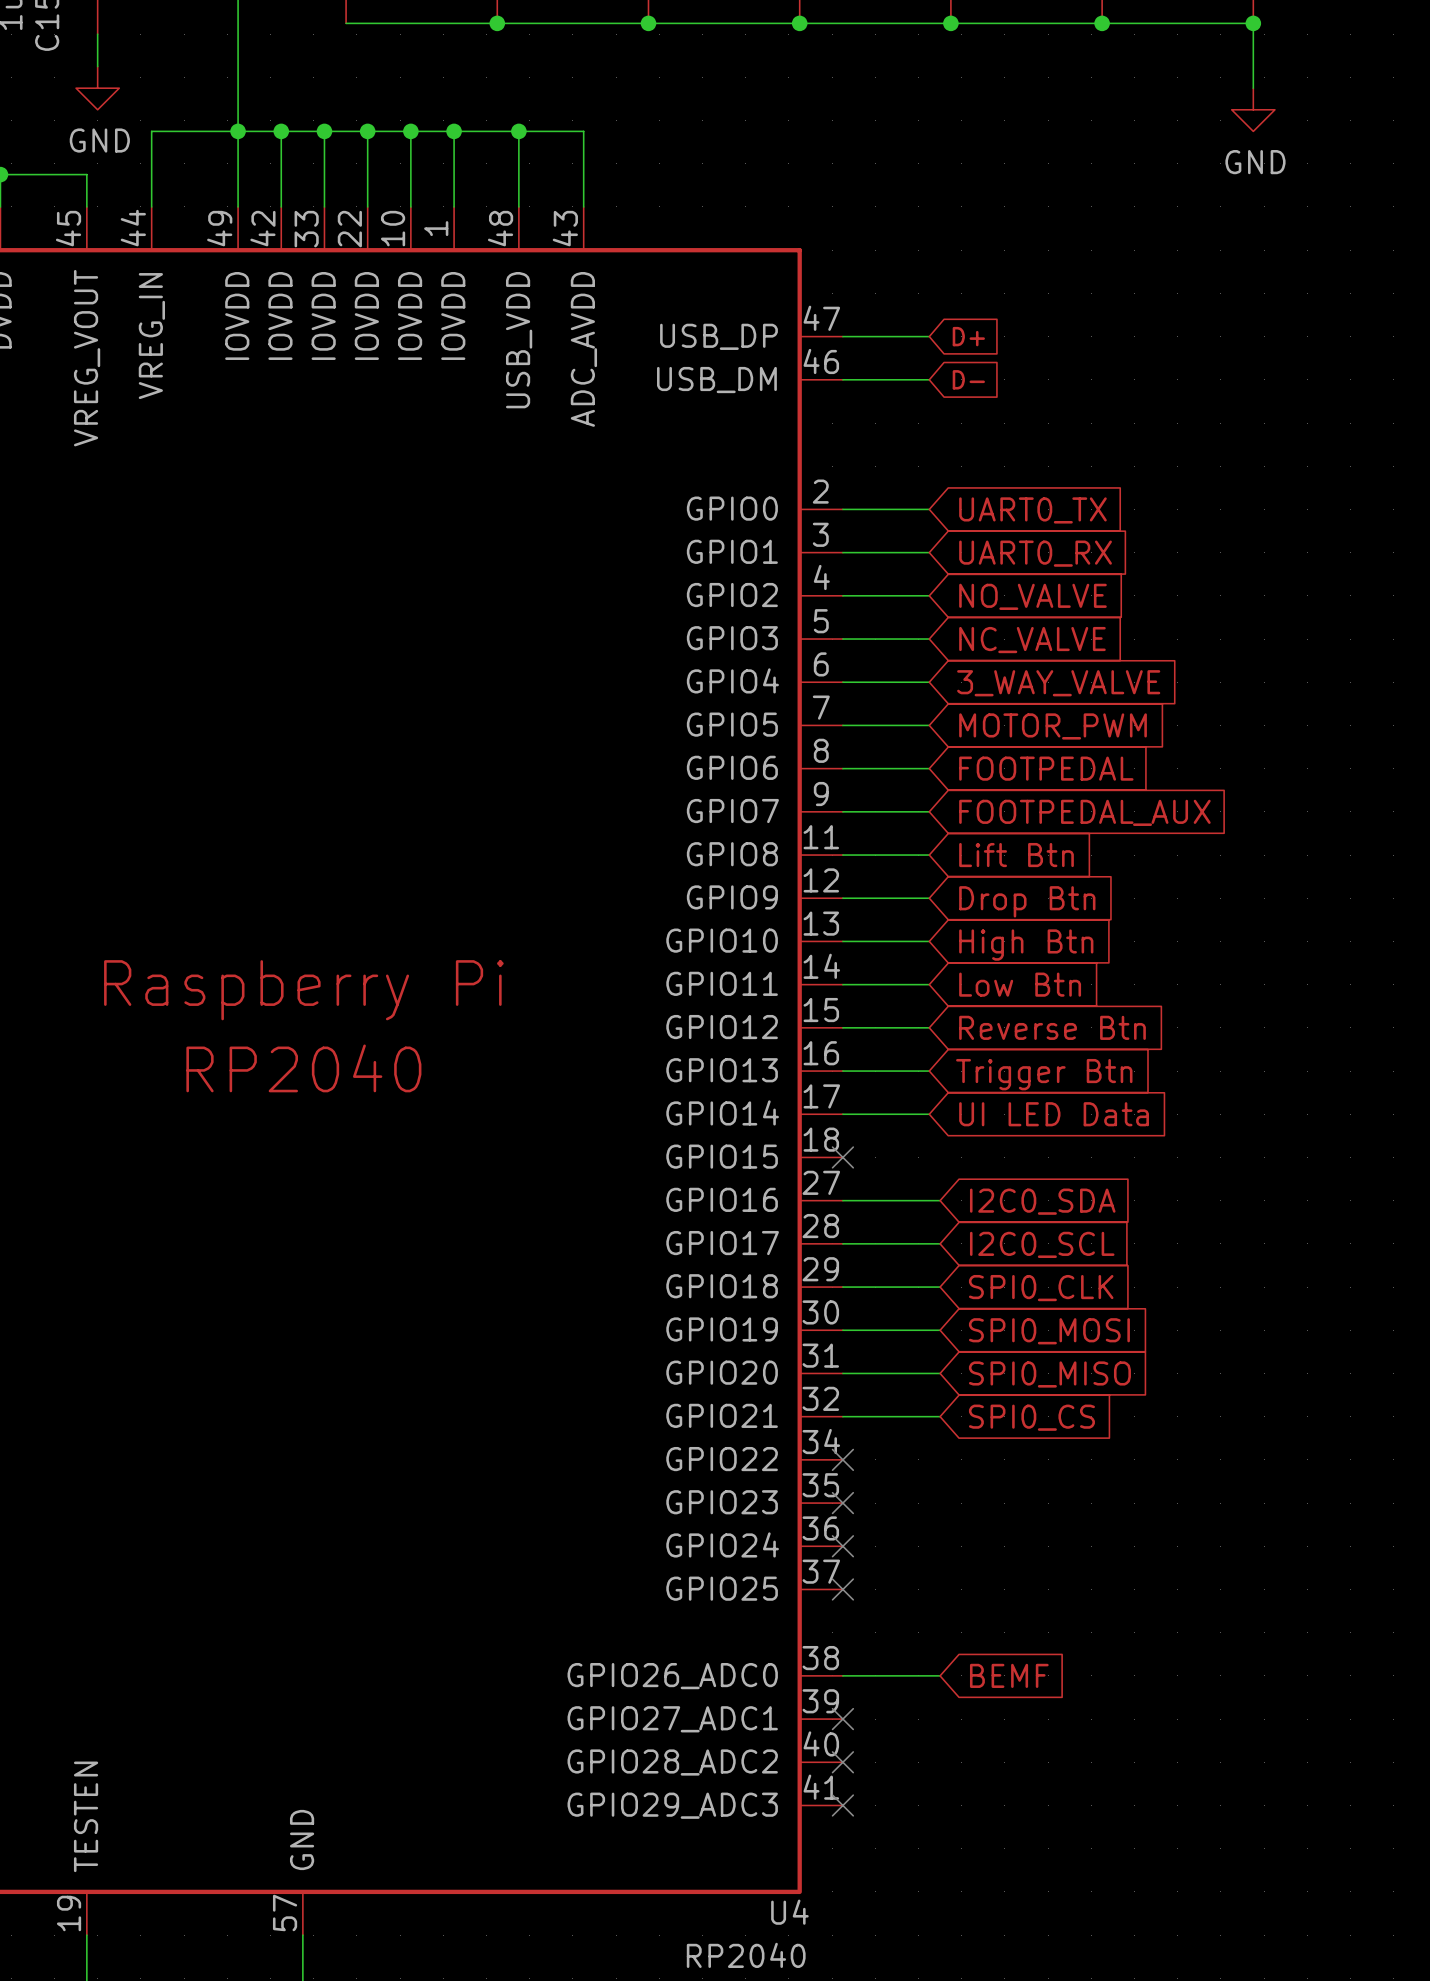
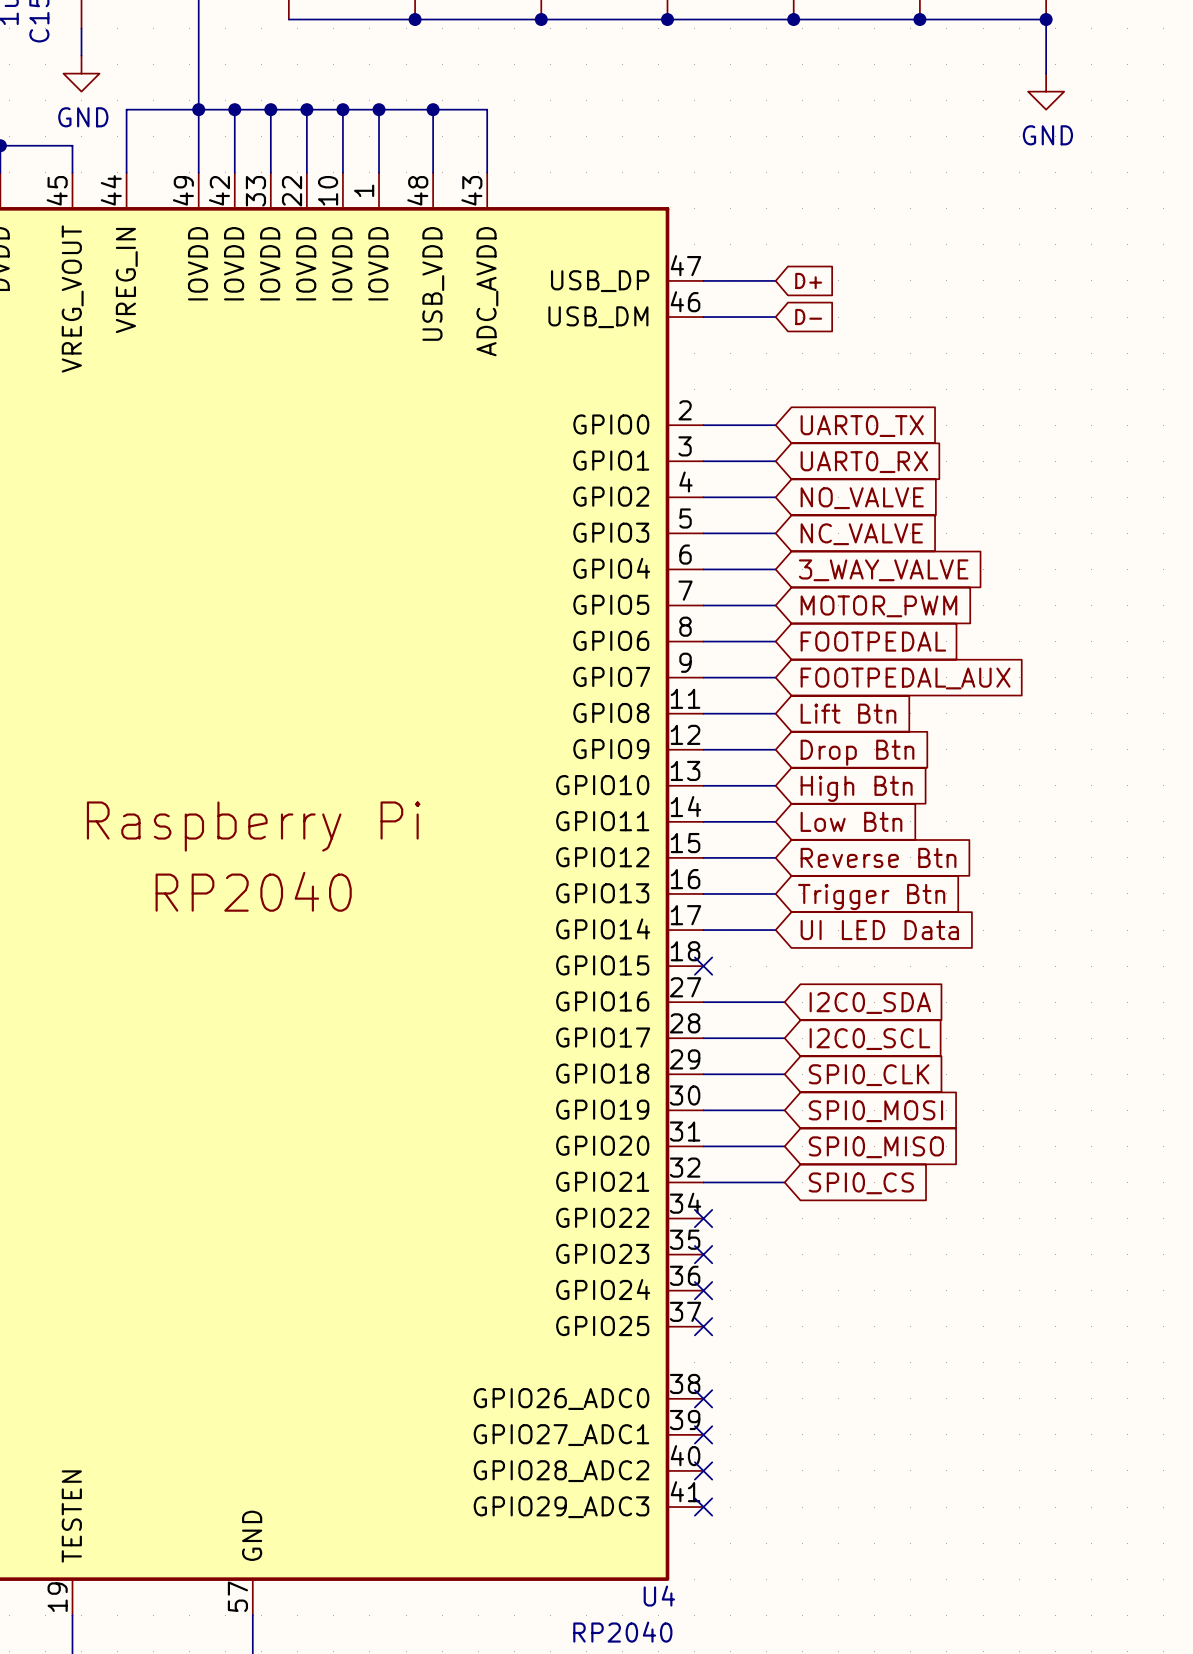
wire: (842, 1675) (940, 1675) -> none
no-connect mark: none -> (703, 1398)
global label: BEMF (1009, 1675) -> none

